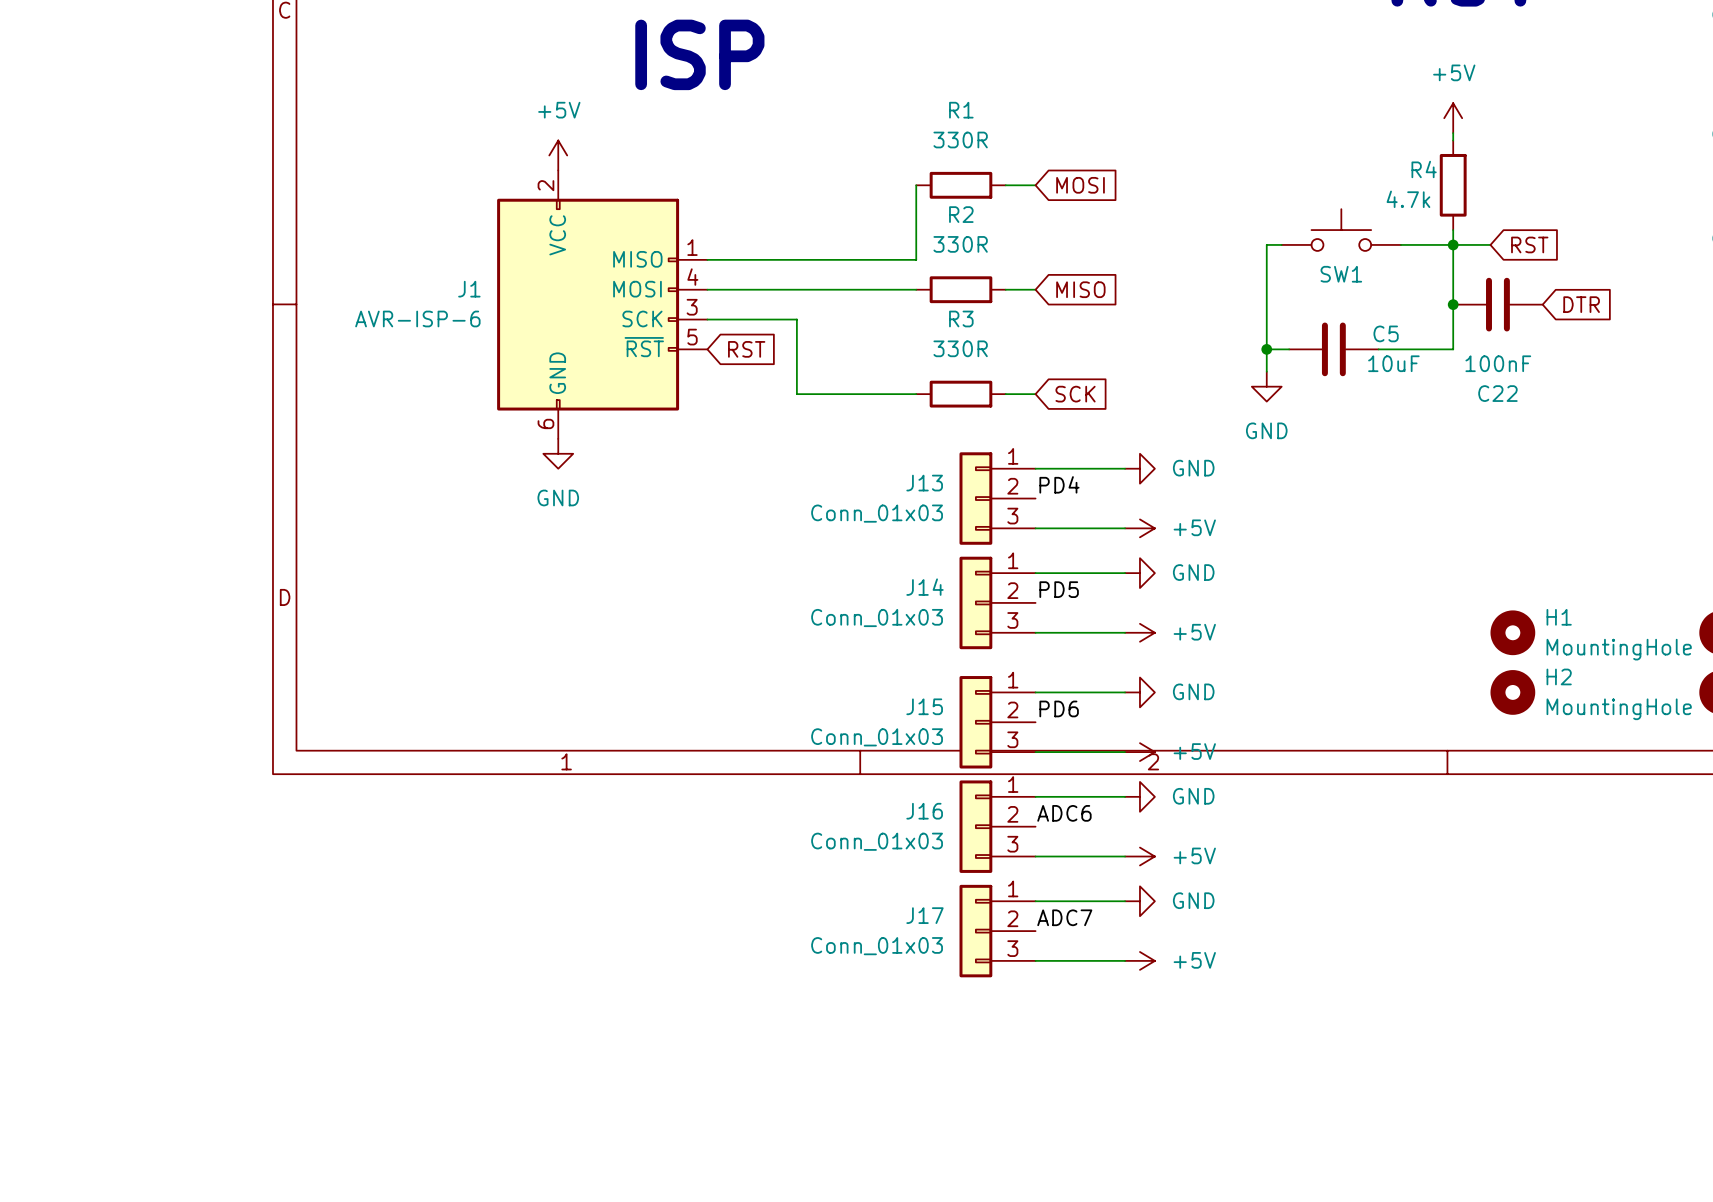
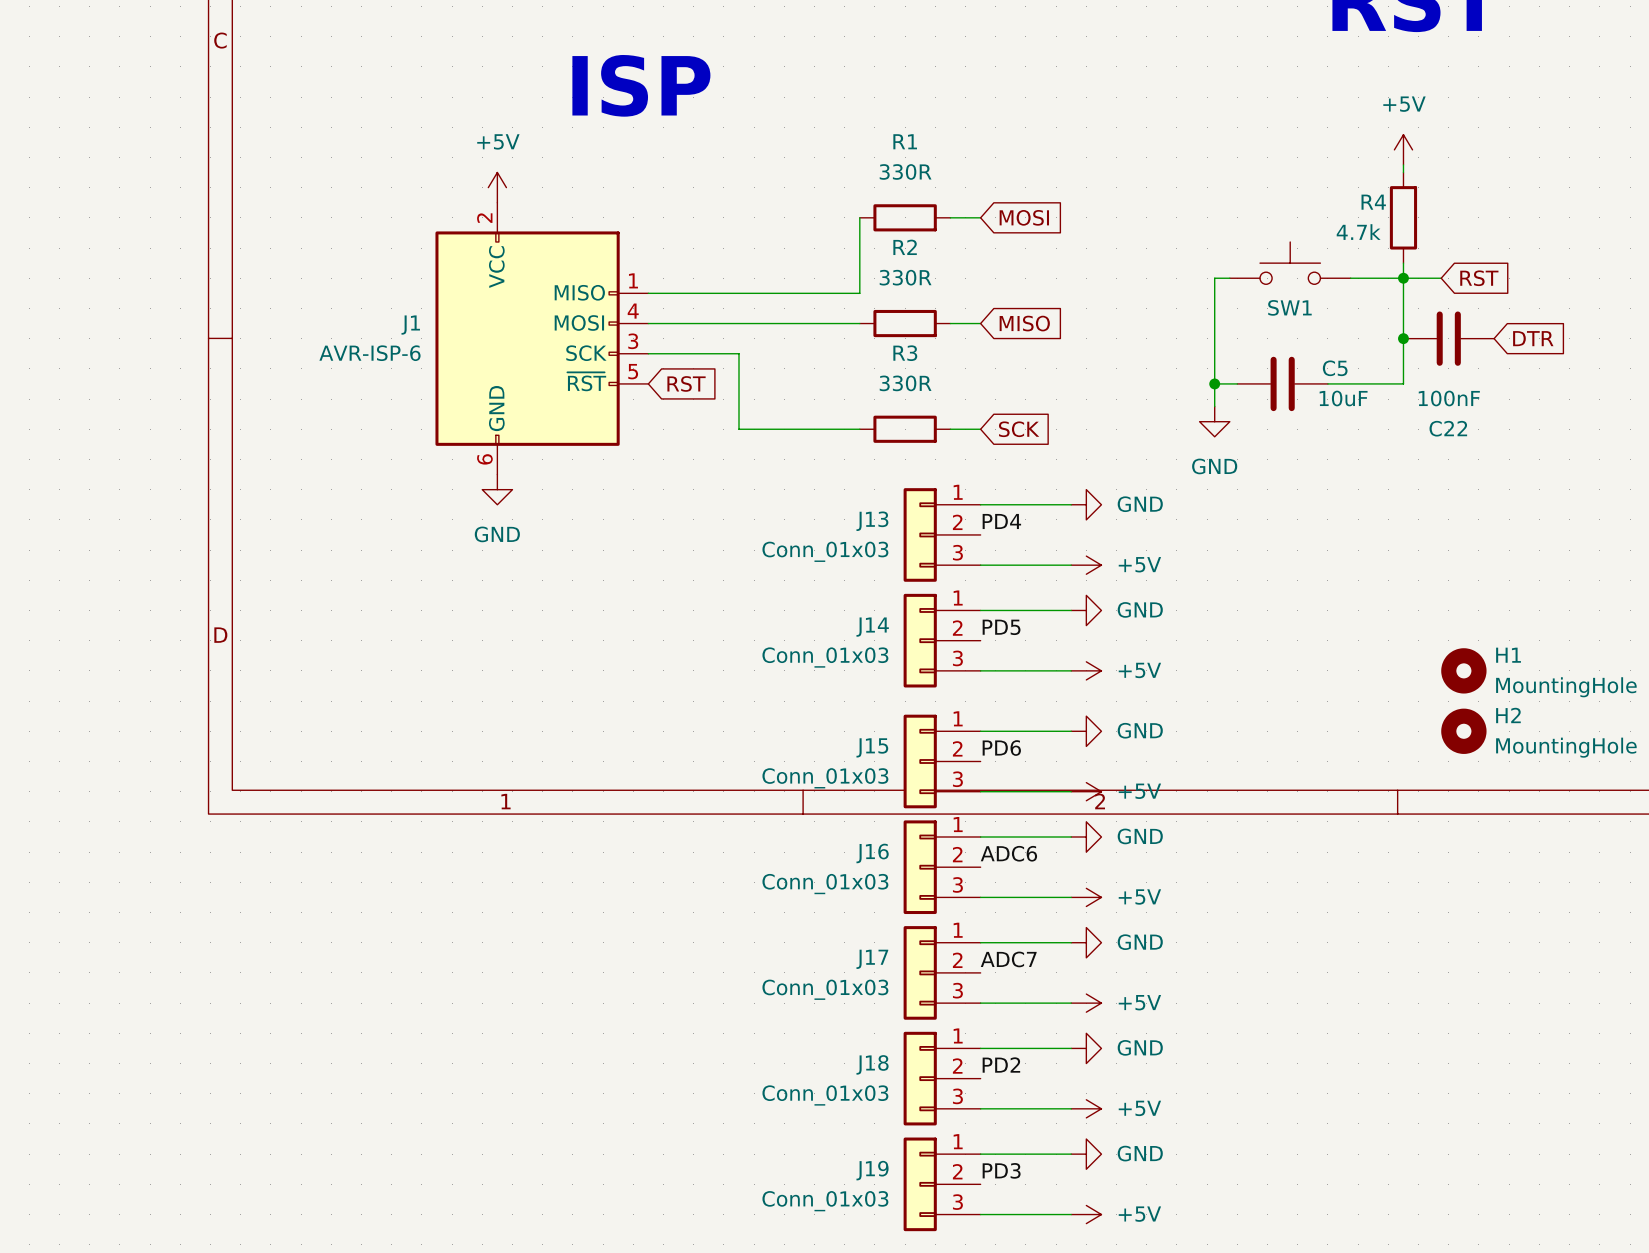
wire: none -> (980, 1048) (1071, 1048)
power symbol: none -> GND (1086, 1048)
label: none -> PD2 (1001, 1065)
J18: none -> Conn_01x03 (942, 1078)
wire: none -> (980, 1108) (1071, 1108)
power symbol: none -> +5V (1086, 1108)
wire: none -> (980, 1154) (1071, 1154)
power symbol: none -> GND (1086, 1154)
label: none -> PD3 (1001, 1170)
J19: none -> Conn_01x03 (942, 1184)
wire: none -> (980, 1214) (1071, 1214)
power symbol: none -> +5V (1086, 1214)

